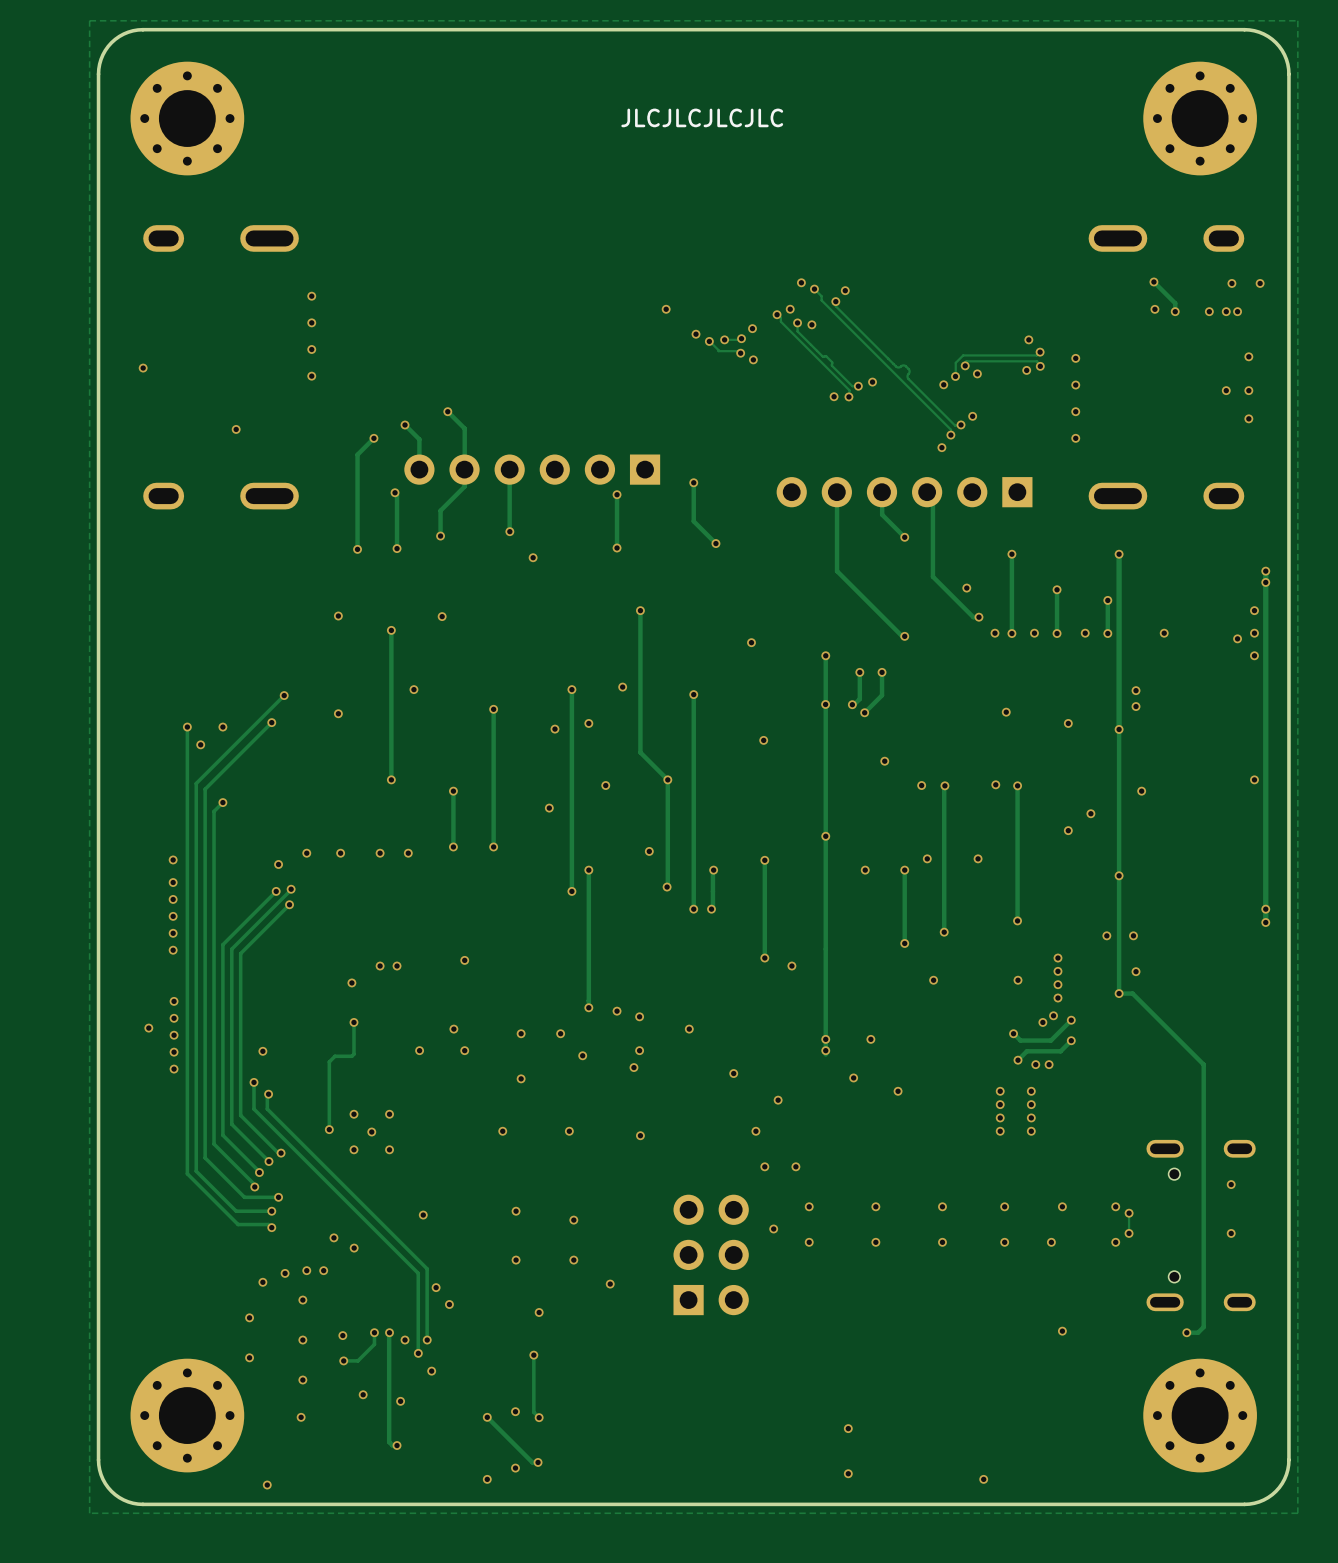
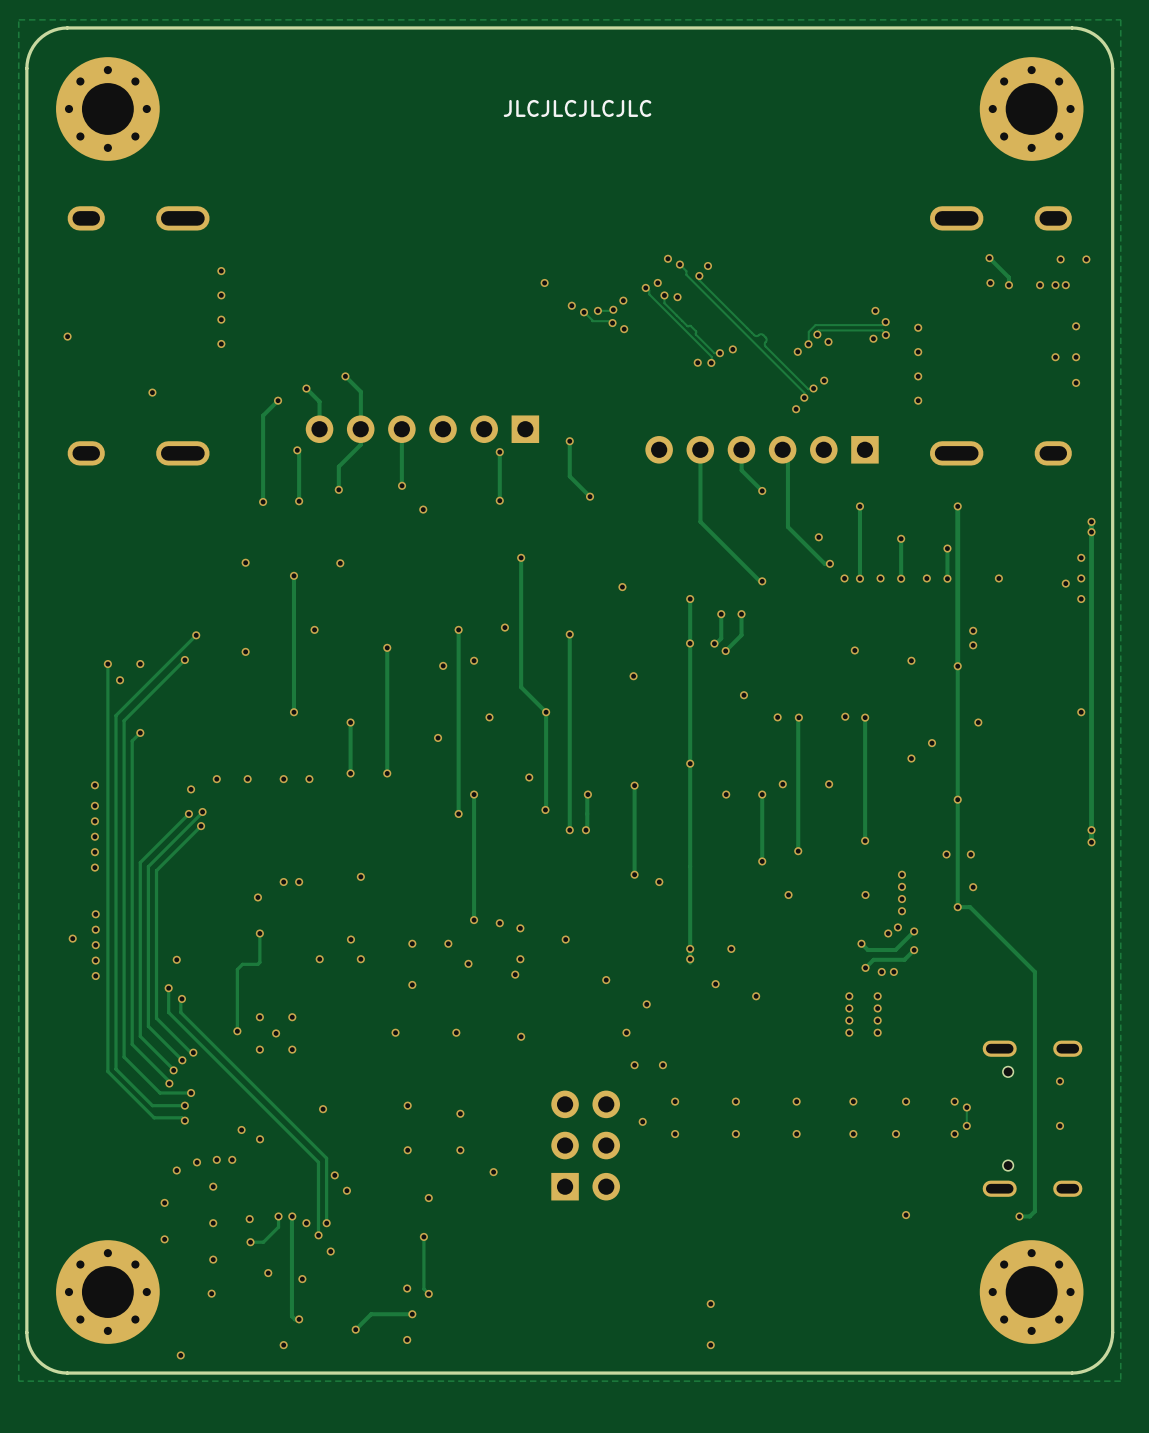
track: (487, 1417) (532, 1462) (538, 1462) -> none
via: (487, 1417) -> none
track: none -> (412, 1314) (371, 1314) (355, 1329)
via: none -> (412, 1314)
via: none -> (355, 1329)
via: (538, 1462) -> none
via: none -> (283, 1345)
via: (487, 1479) -> none
via: (983, 1479) -> none

